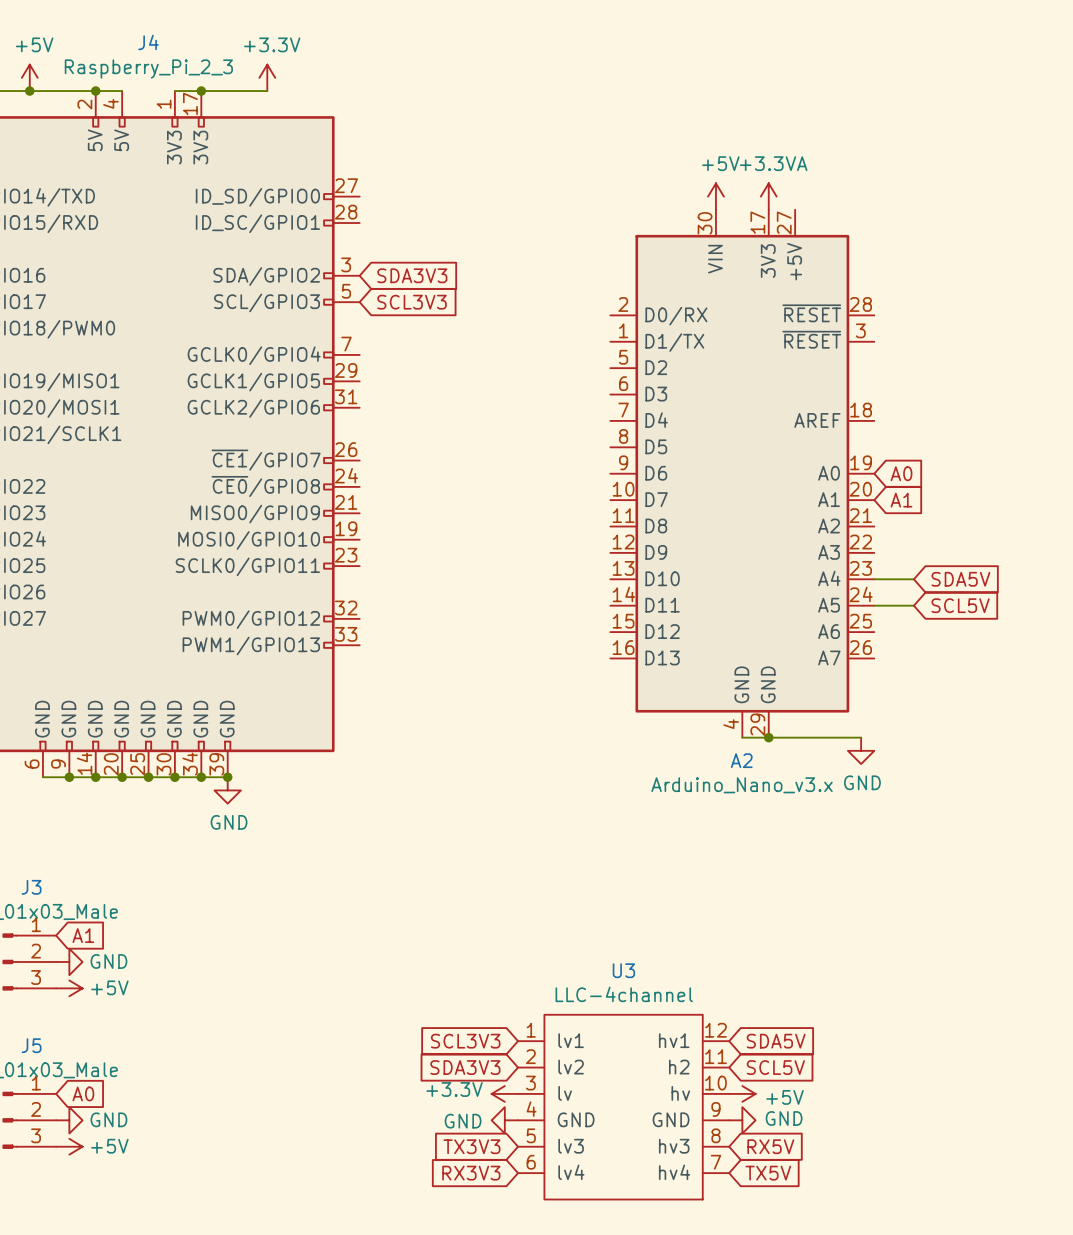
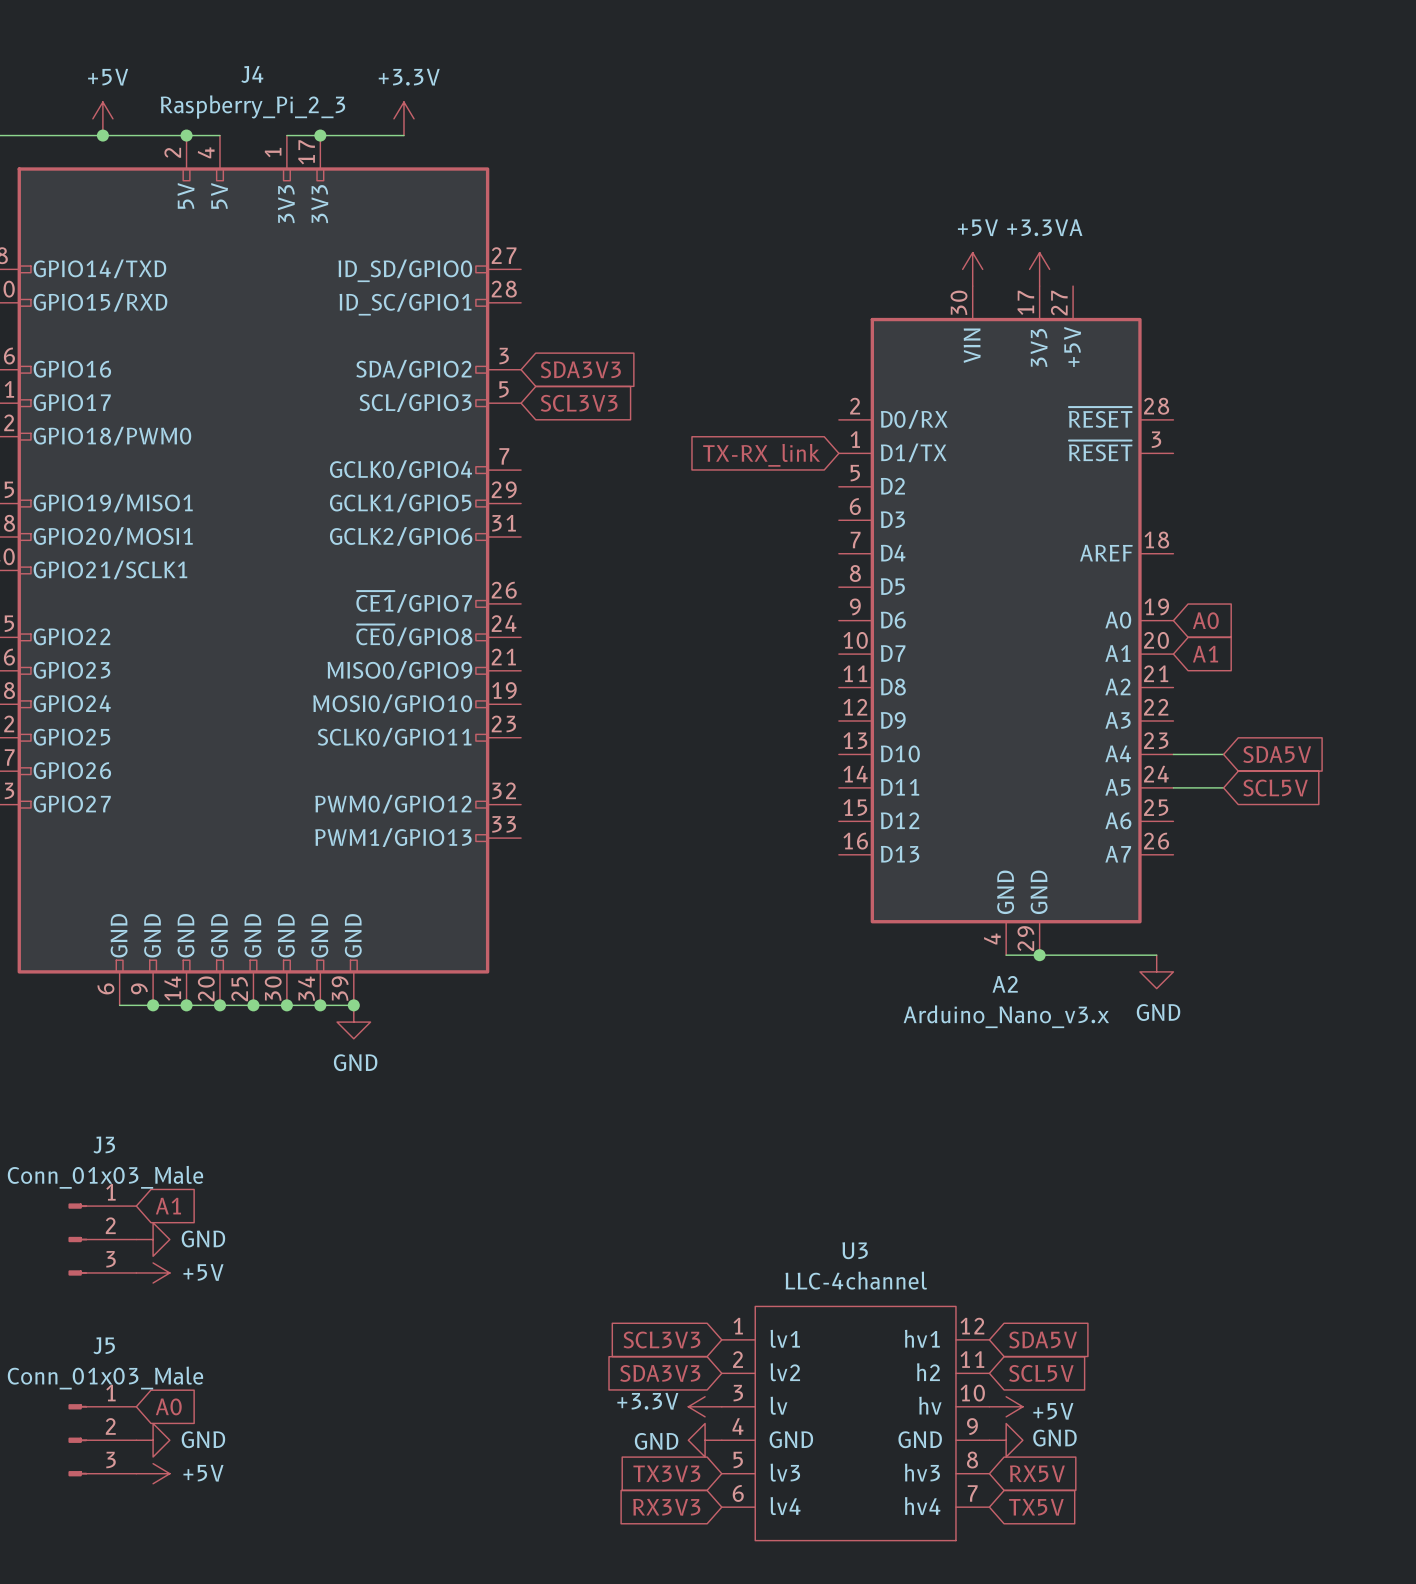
global label: none -> TX-RX_link (761, 455)

